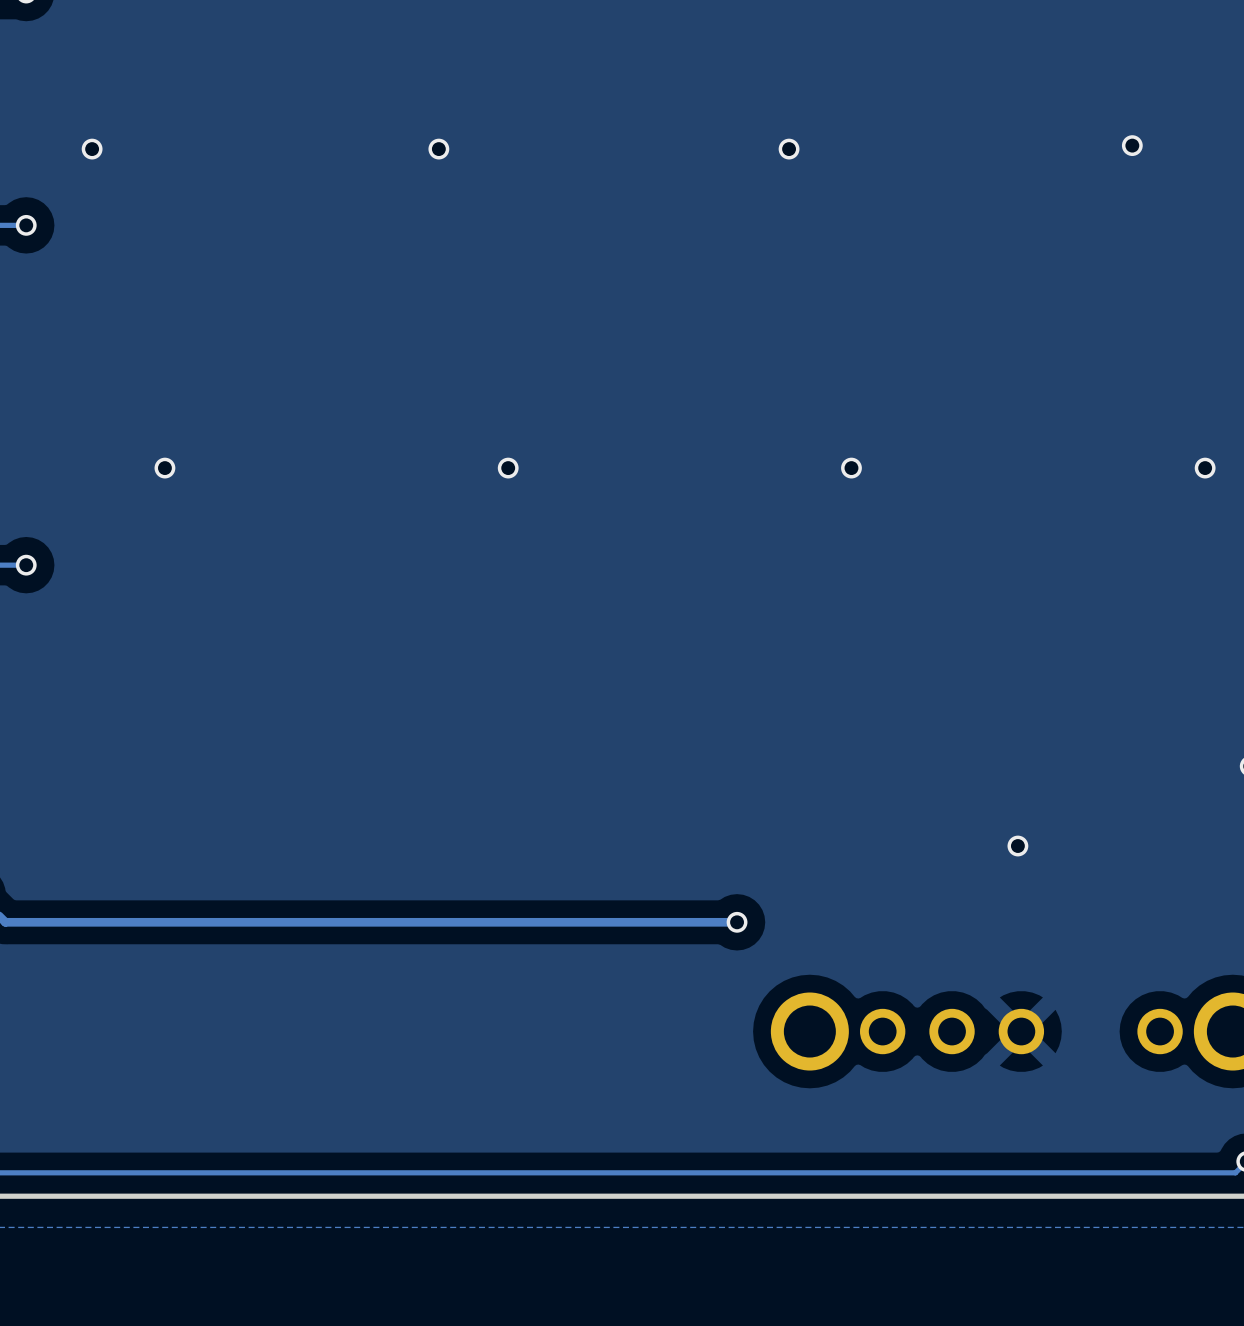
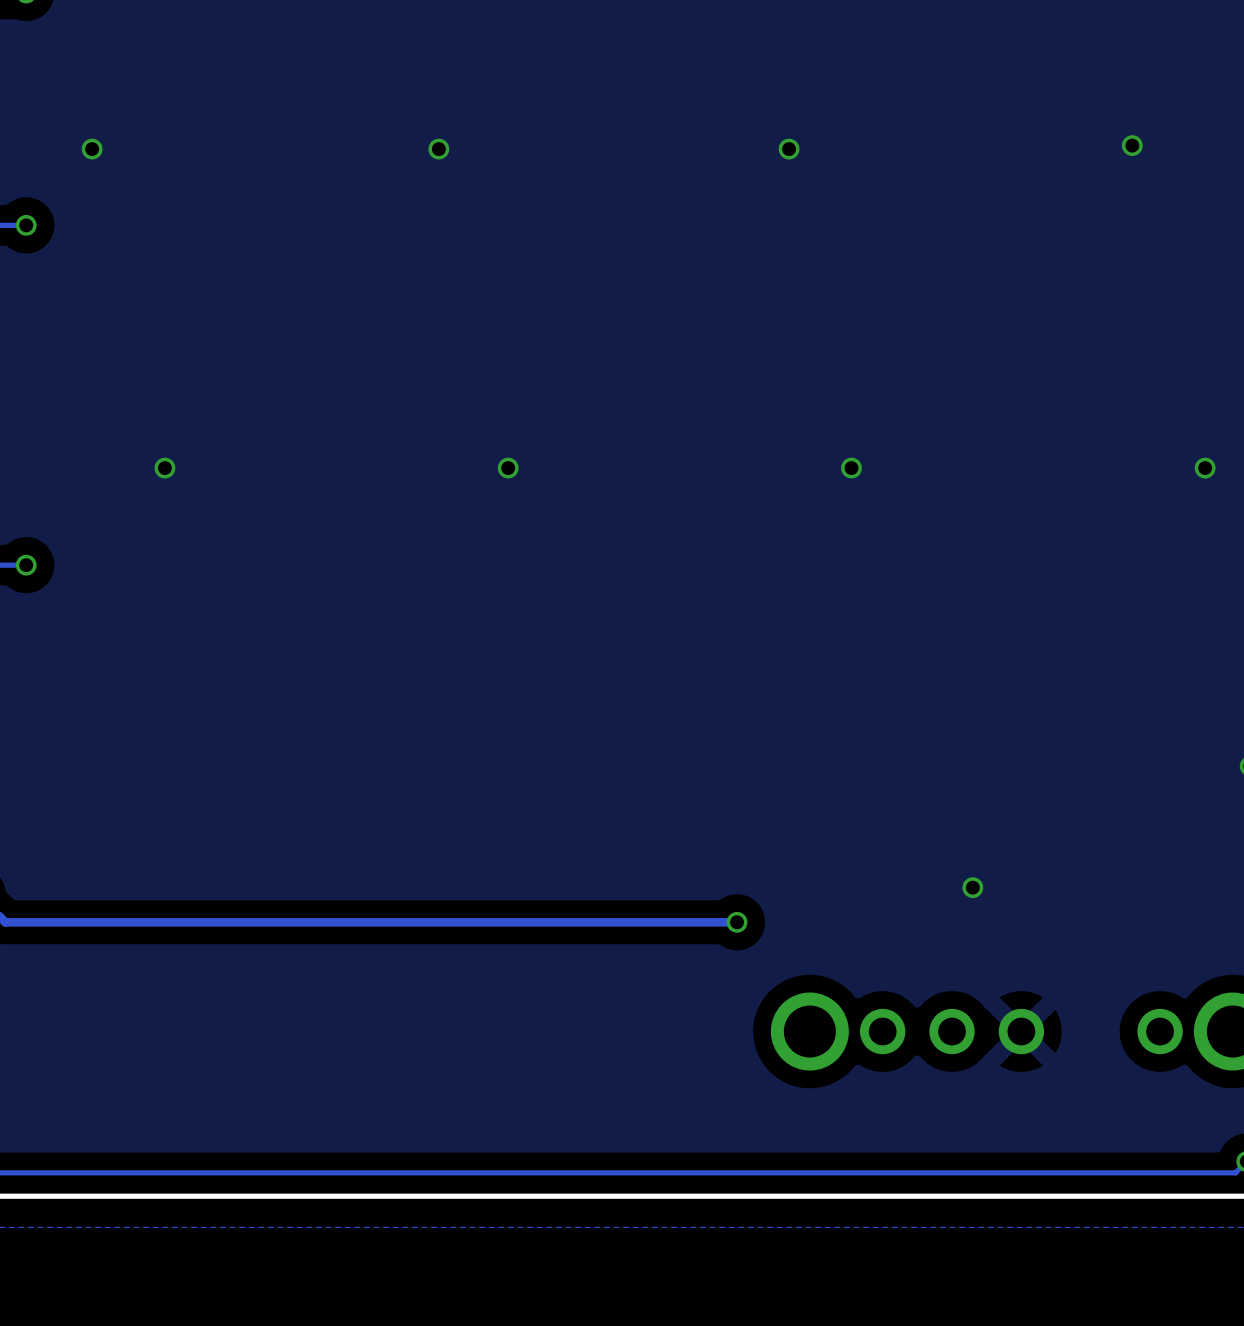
via position: (1017, 846) -> (972, 887)

